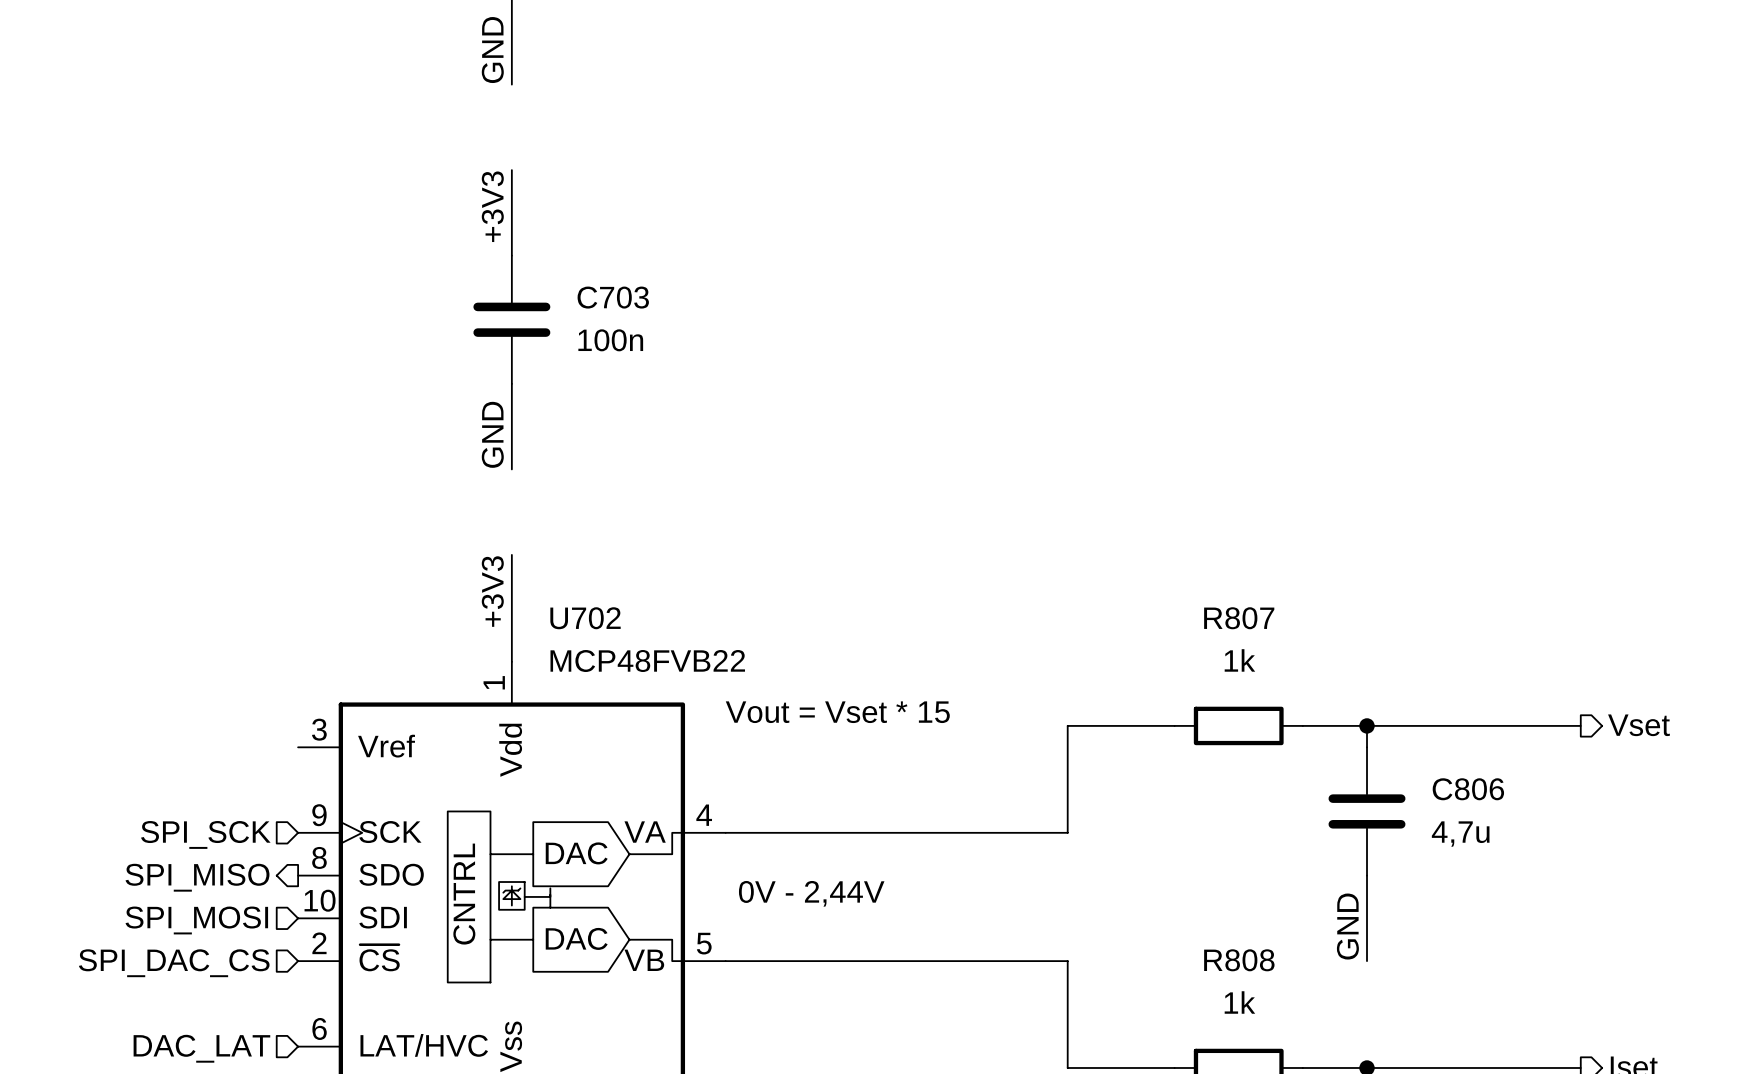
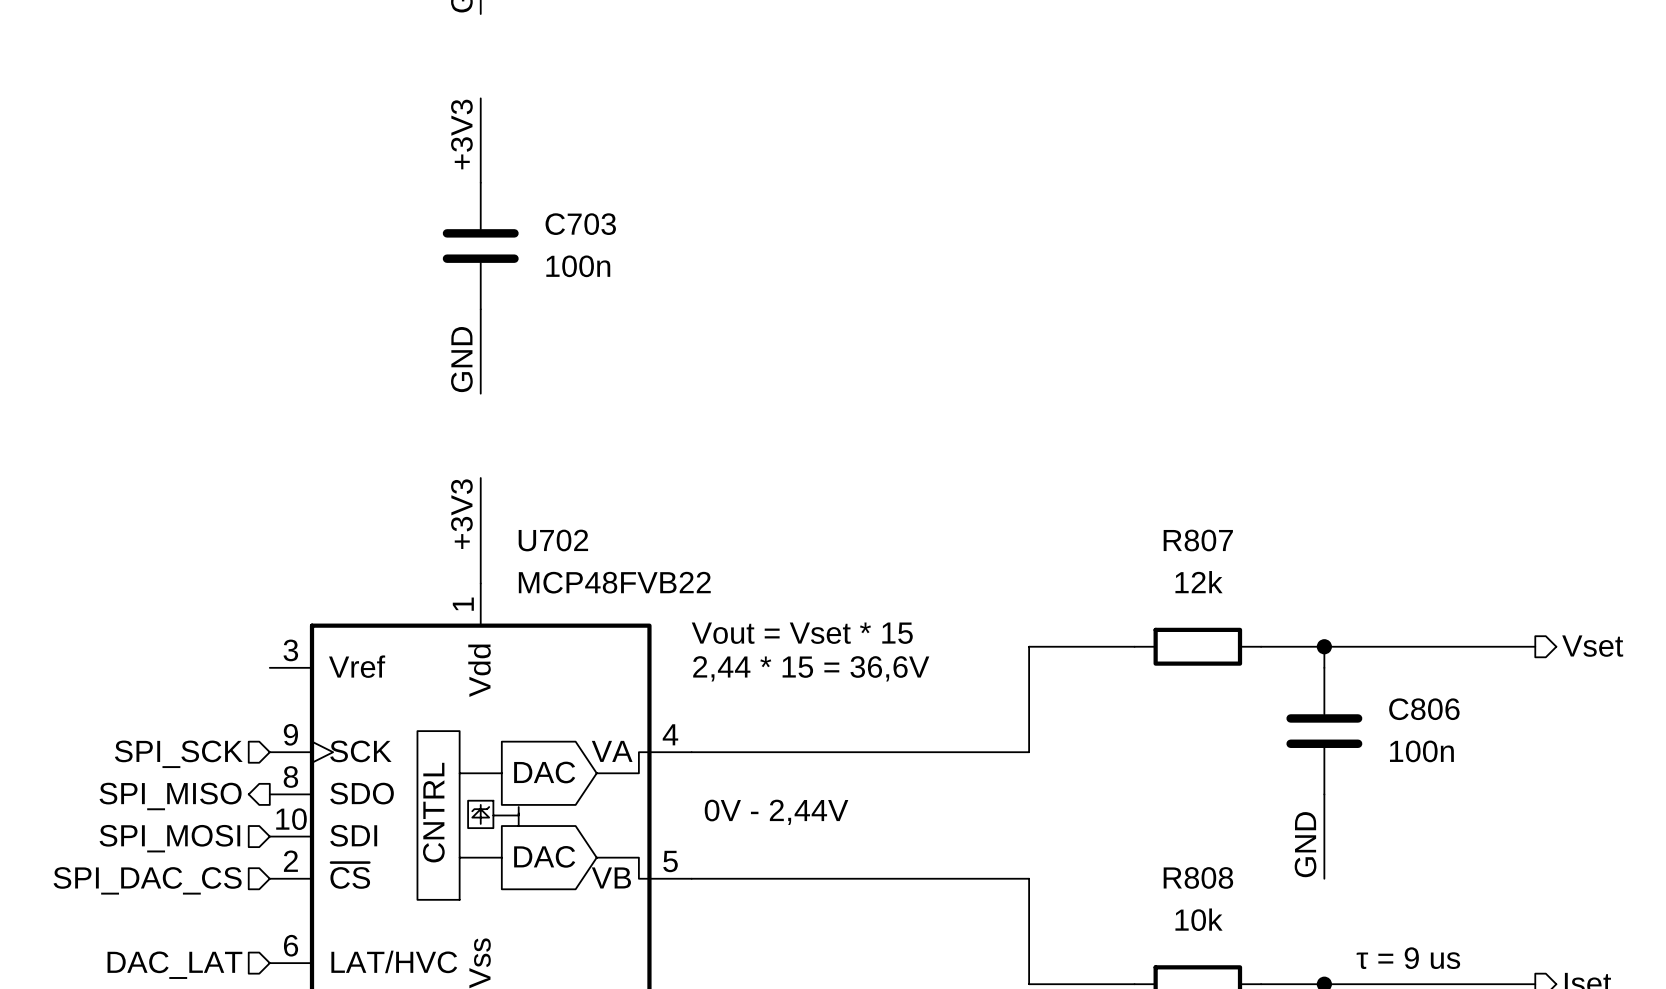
R807 value: 1k (1239, 660) -> 12k (1199, 582)
text: none -> 2,44 * 15 = 36,6V (811, 668)
C806 value: 4,7u (1460, 834) -> 100n (1421, 751)
R808 value: 1k (1239, 1002) -> 10k (1199, 919)
text: none -> τ = 9 us (1408, 958)

